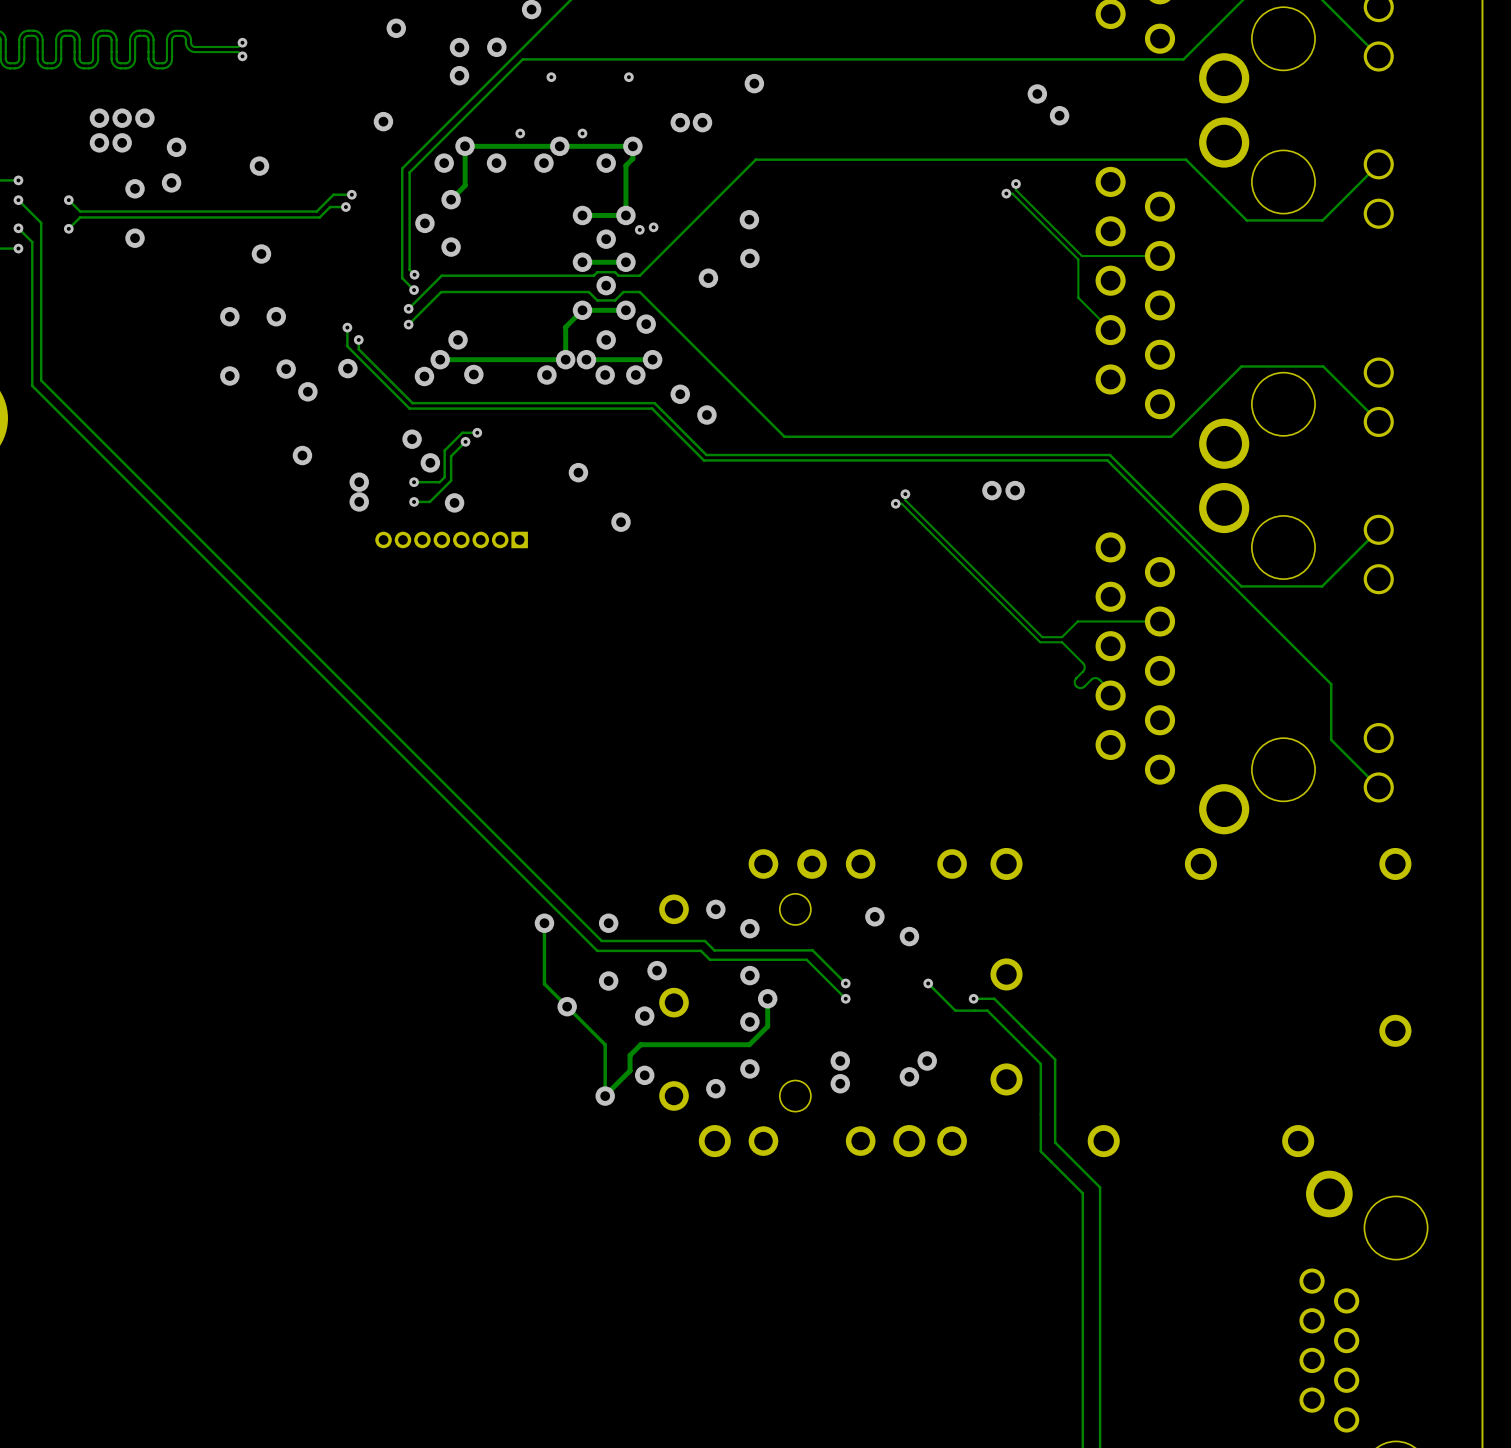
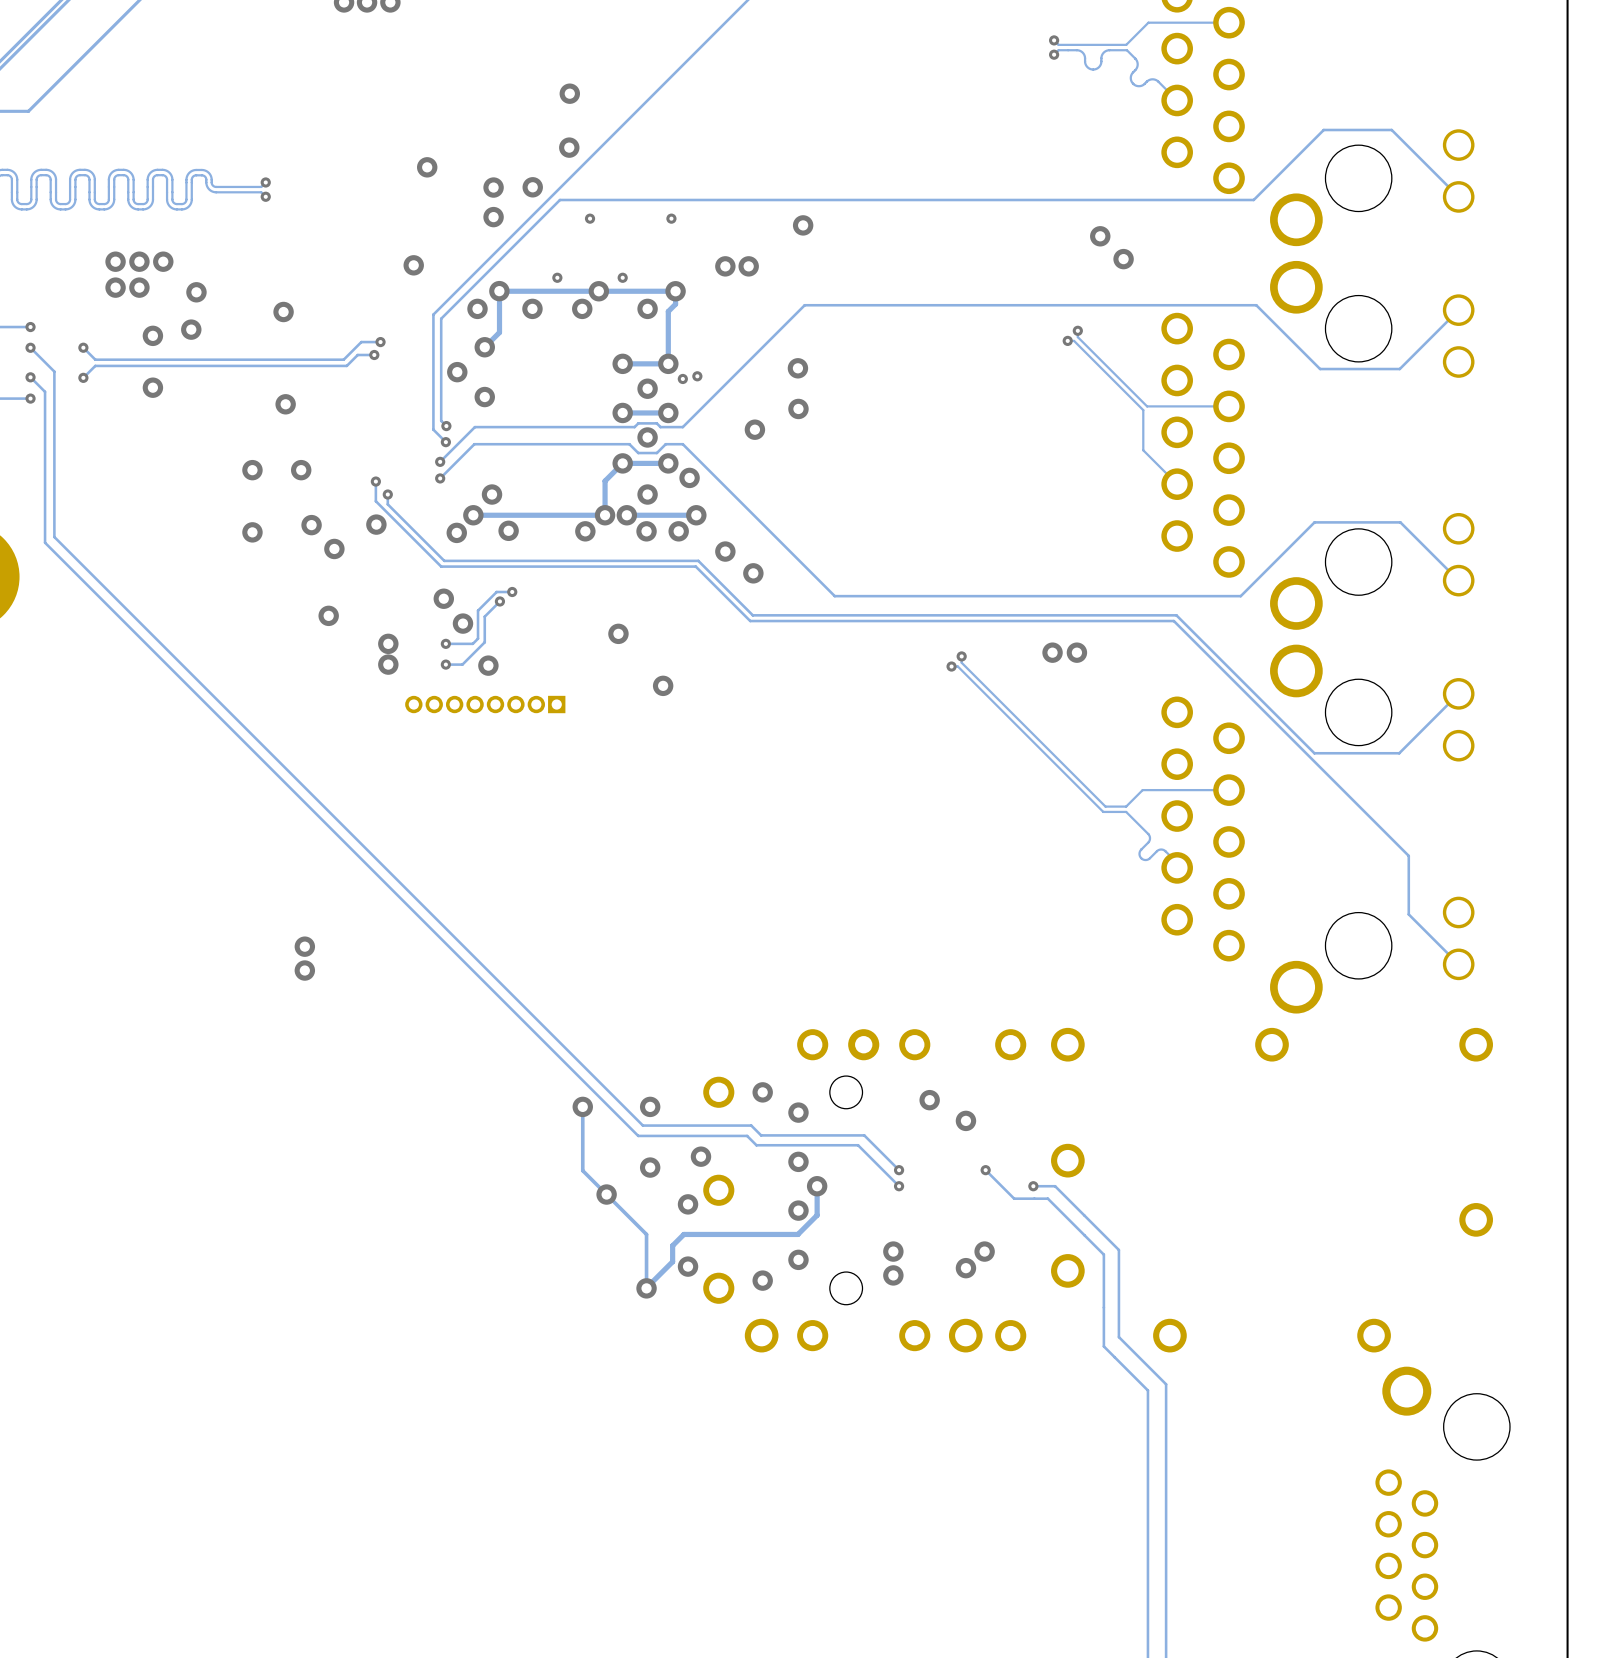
via: none -> (304, 946)
via: none -> (304, 970)

